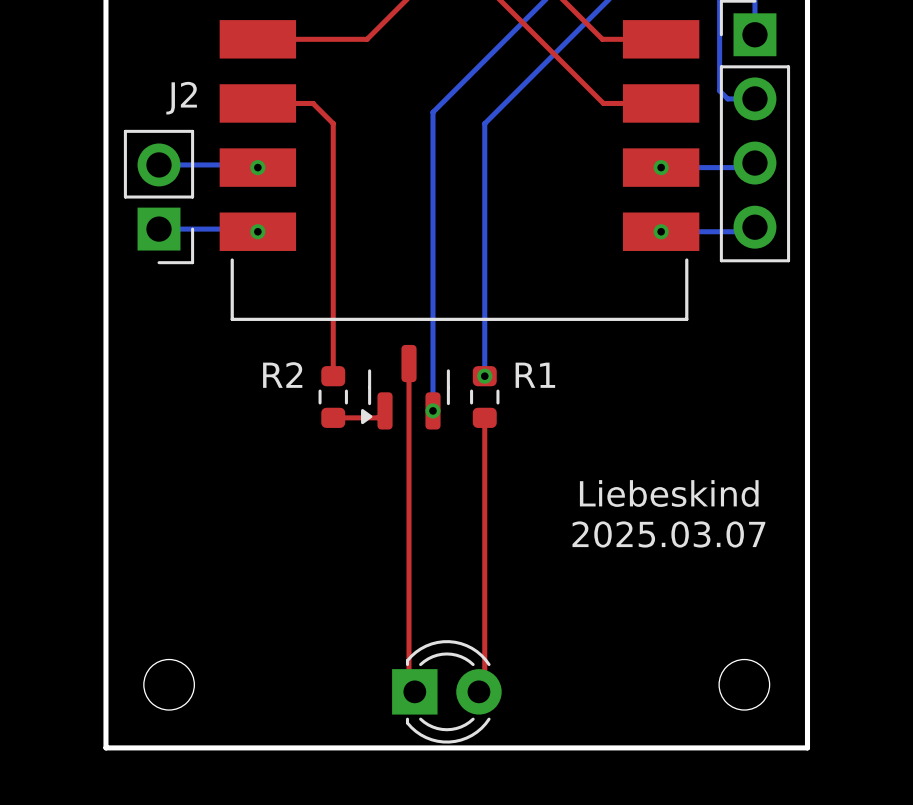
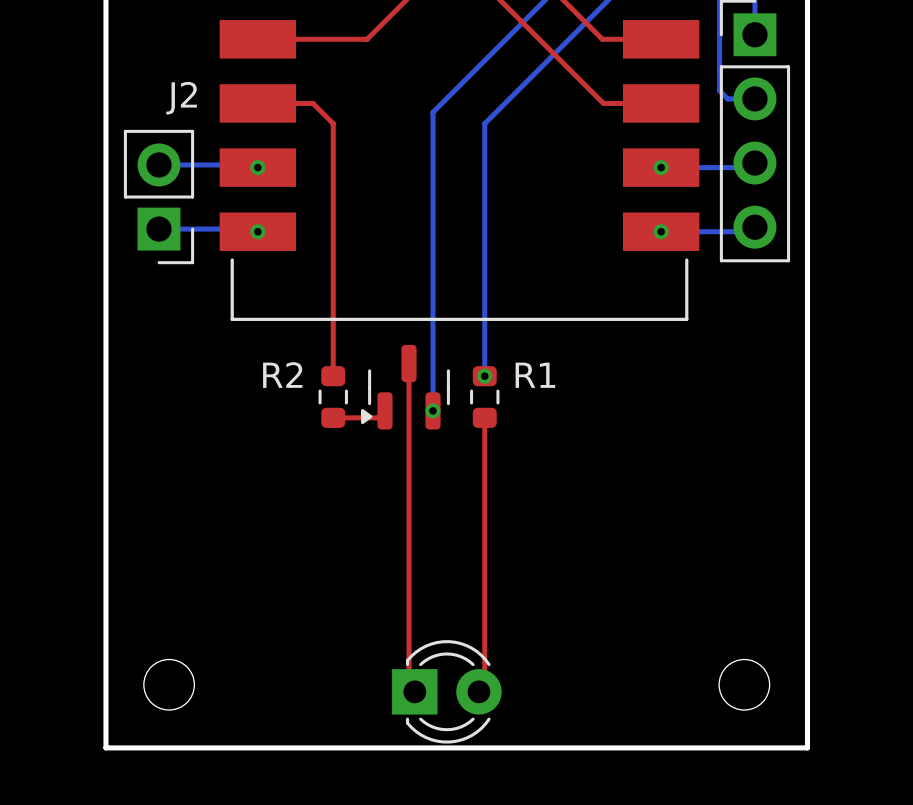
text: Liebeskind (669, 493) -> none
text: 2025.03.07 (668, 534) -> none

